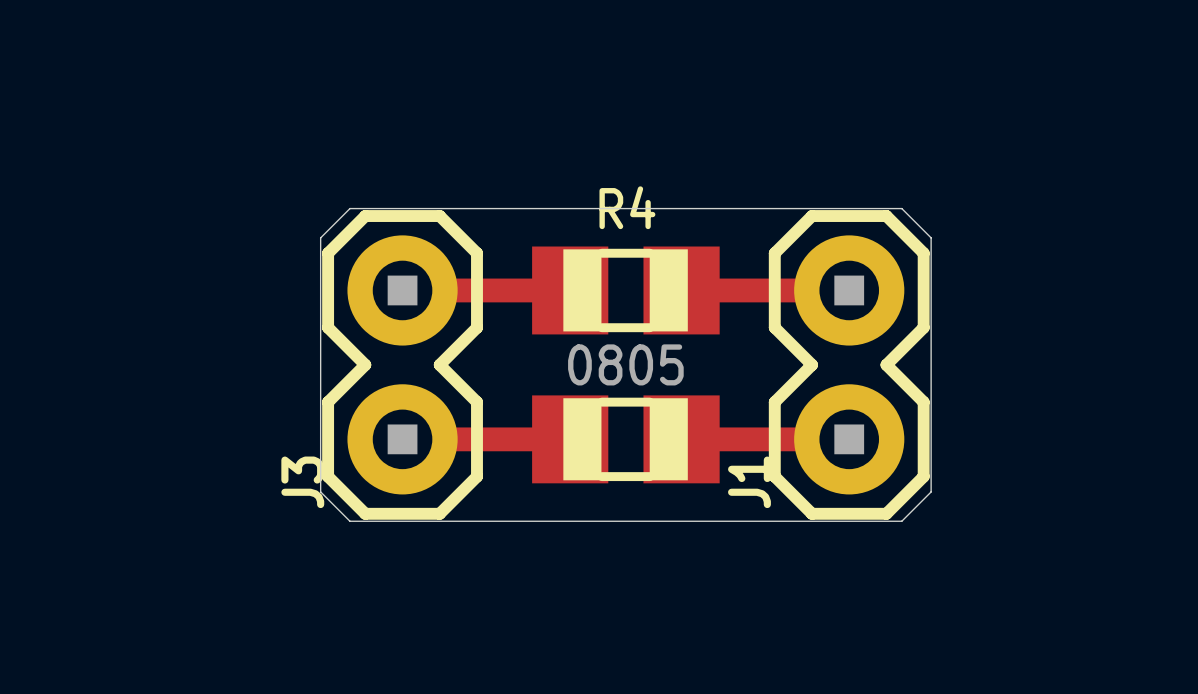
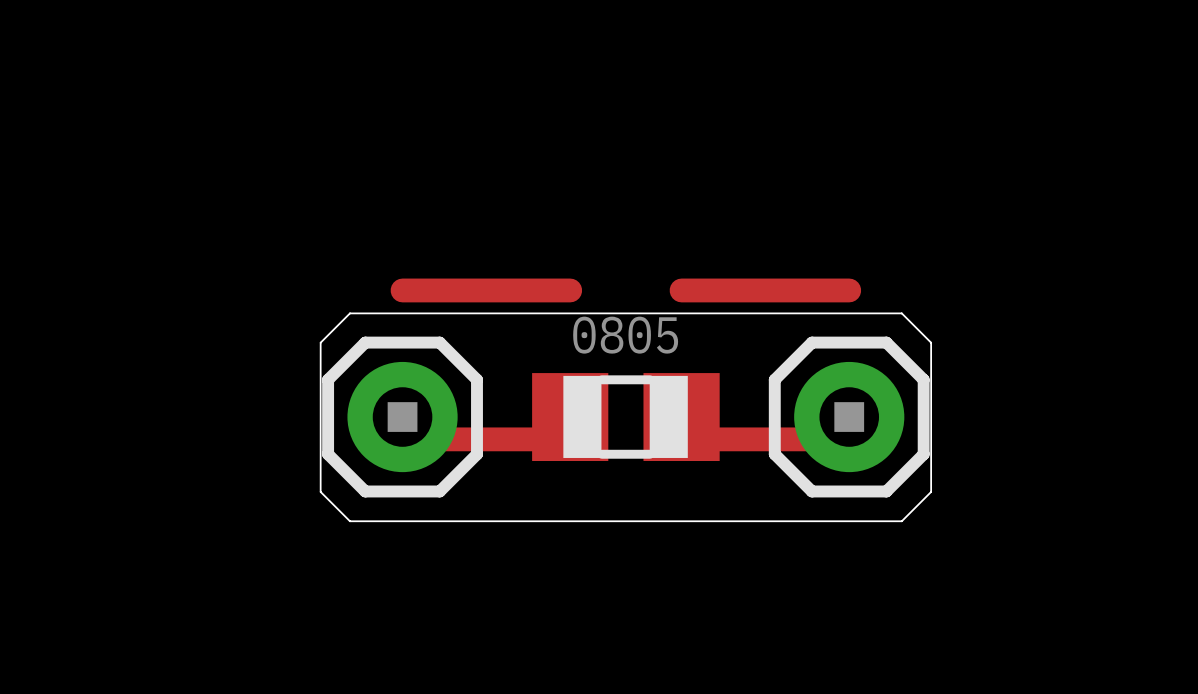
R4: (625, 290) -> none
board edge: (320, 342) (320, 237) (349, 208) (901, 208) (931, 237) (931, 342) -> (320, 342) (349, 313) (901, 313) (931, 342)
J3: (402, 364) -> none
text position: 0805 (625, 364) -> 0805 (625, 335)
J1: (849, 364) -> none
part: none -> (402, 417)
part: none -> (849, 417)
part position: (625, 439) -> (625, 417)

